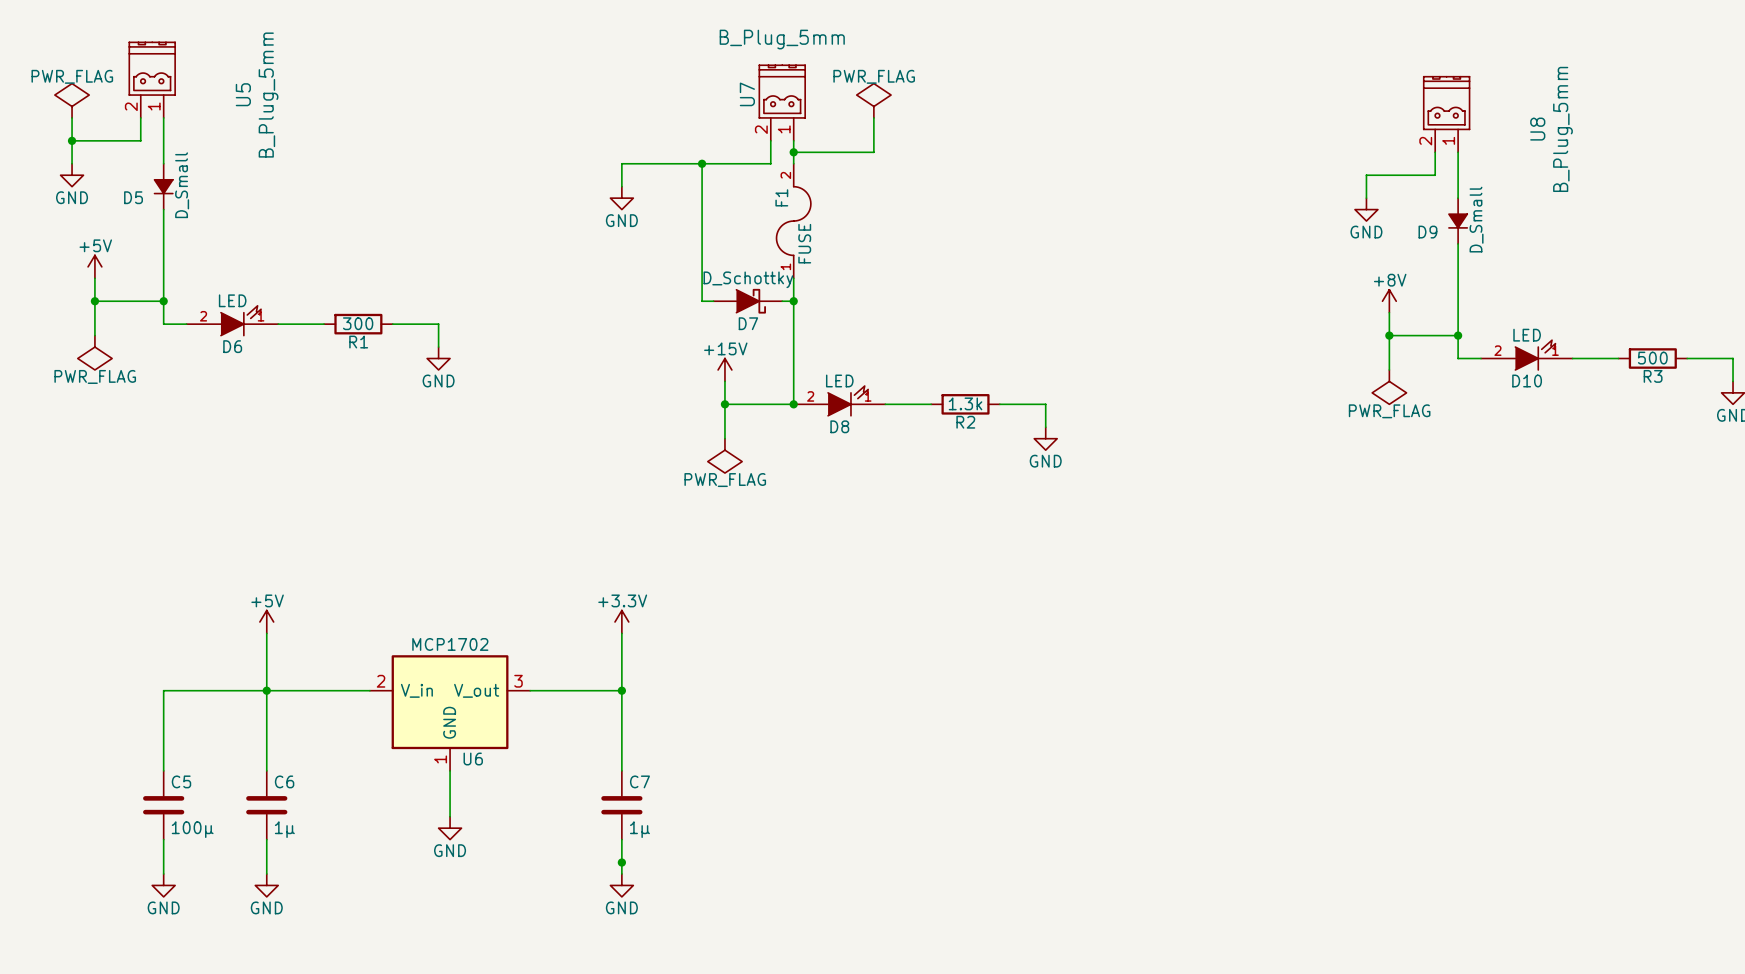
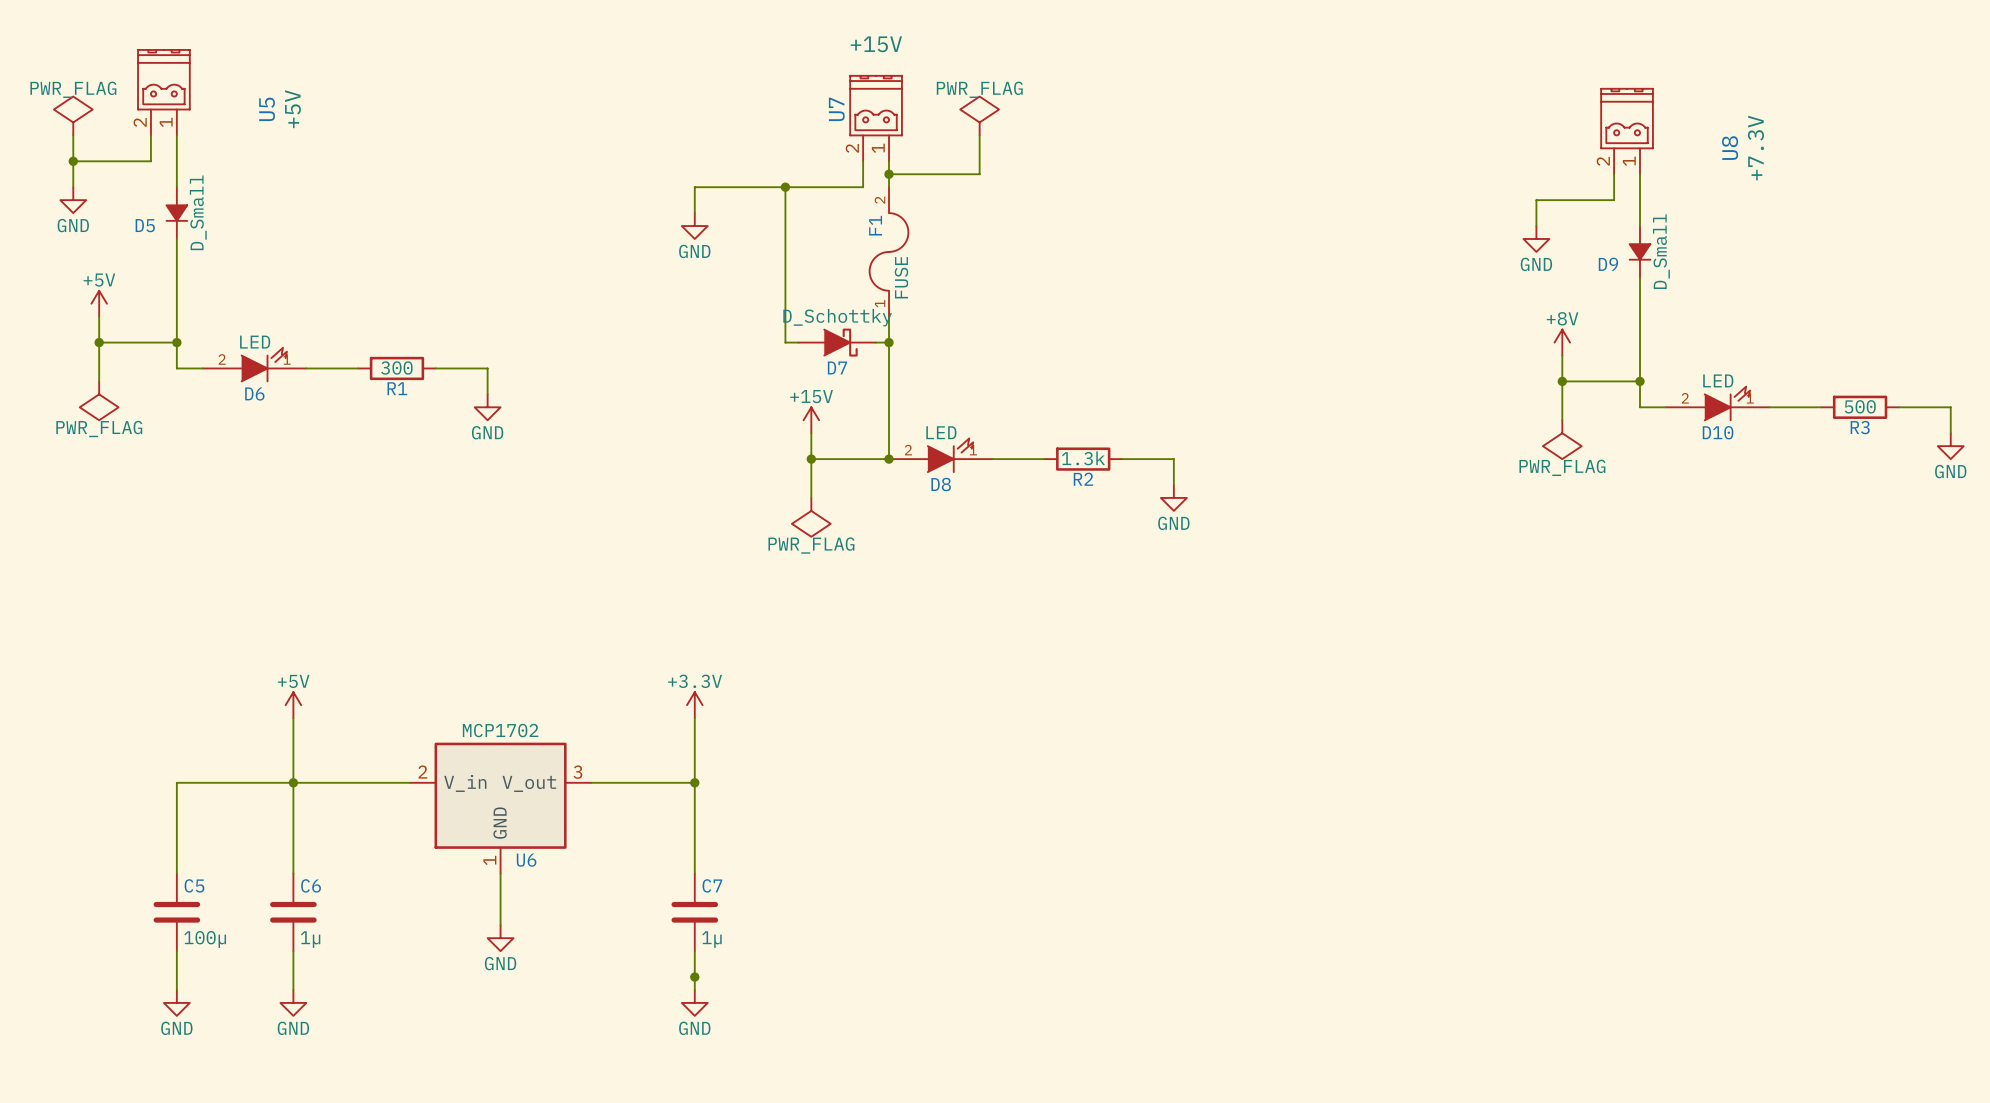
U7 value: B_Plug_5mm (782, 39) -> +15V (876, 44)
U5 value: B_Plug_5mm (268, 95) -> +5V (292, 109)
U8 value: B_Plug_5mm (1562, 129) -> +7.3V (1755, 148)

